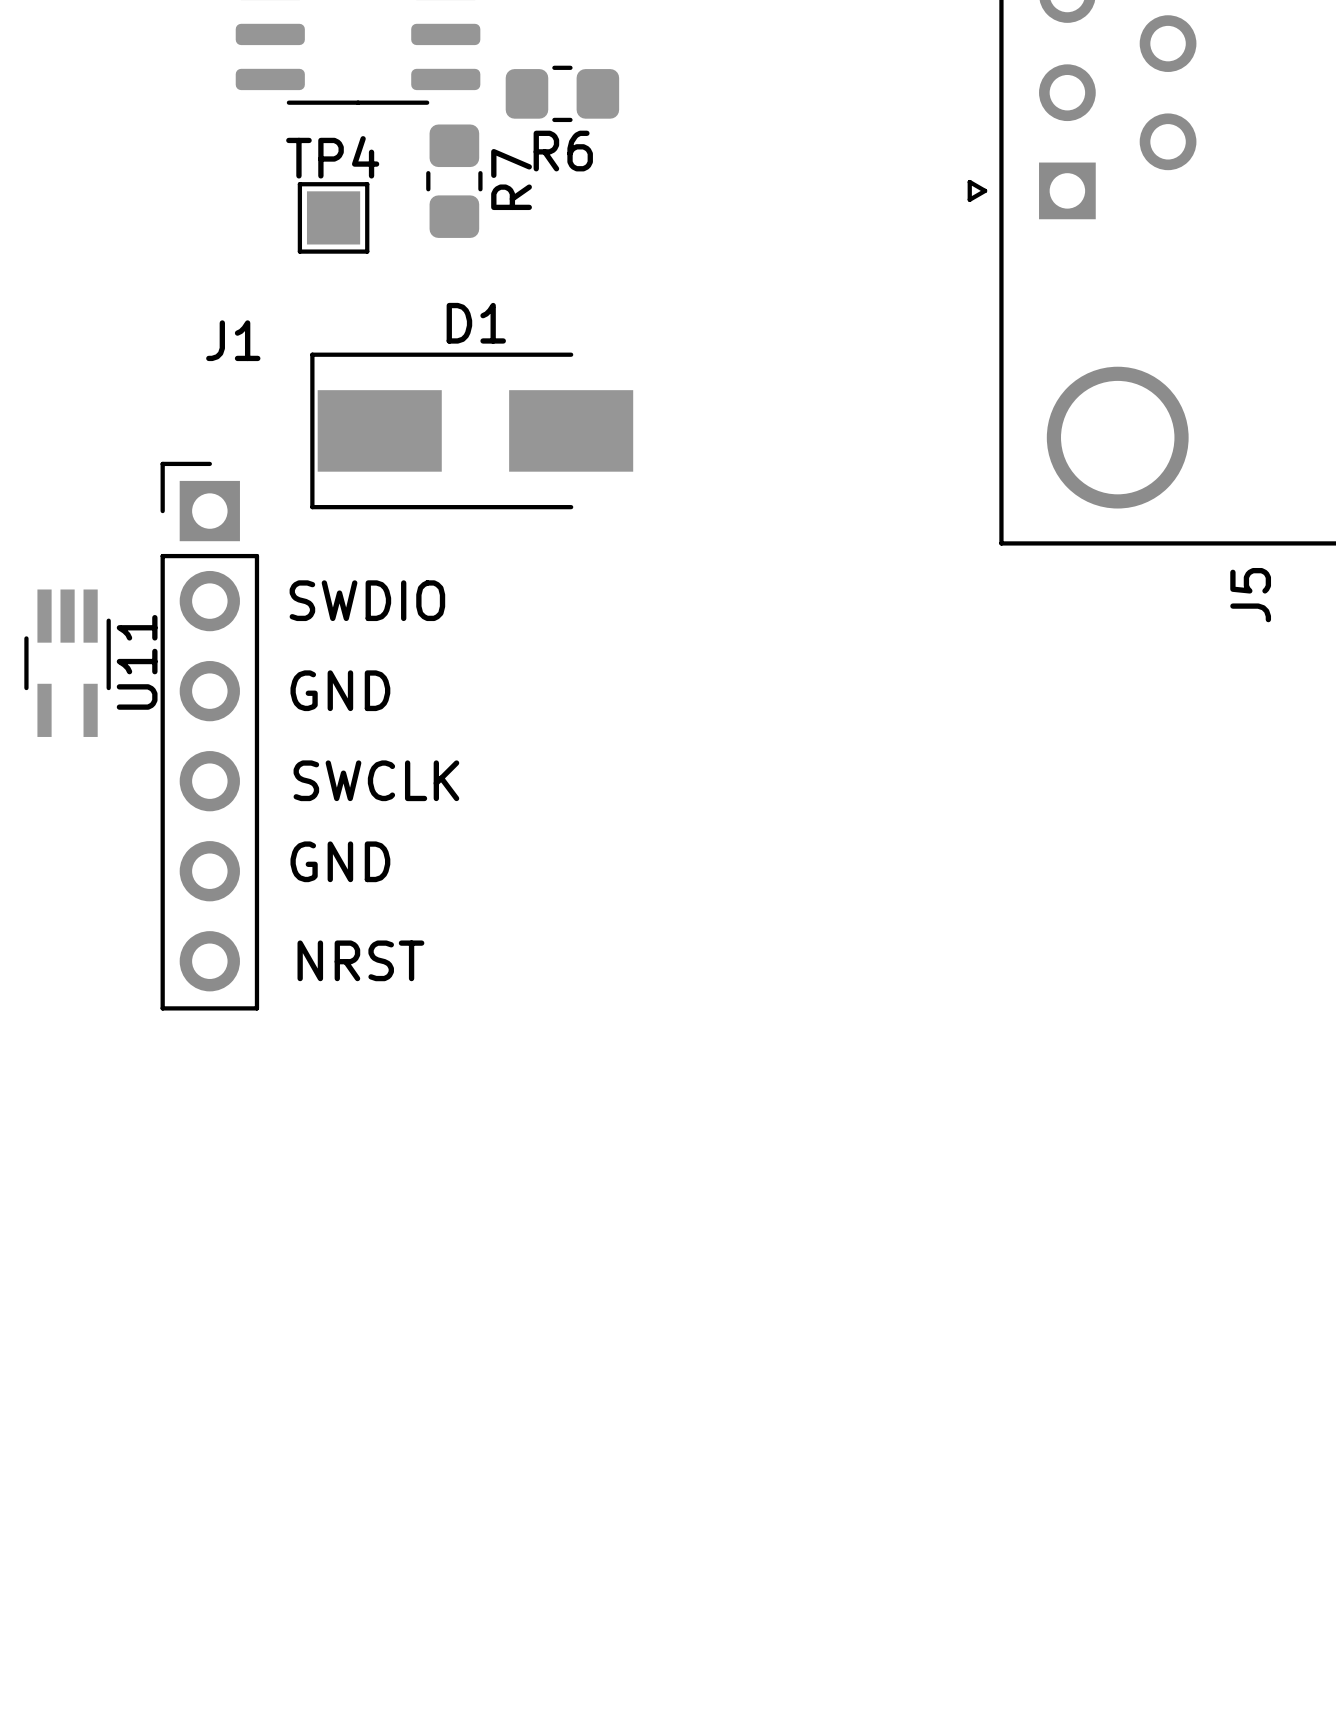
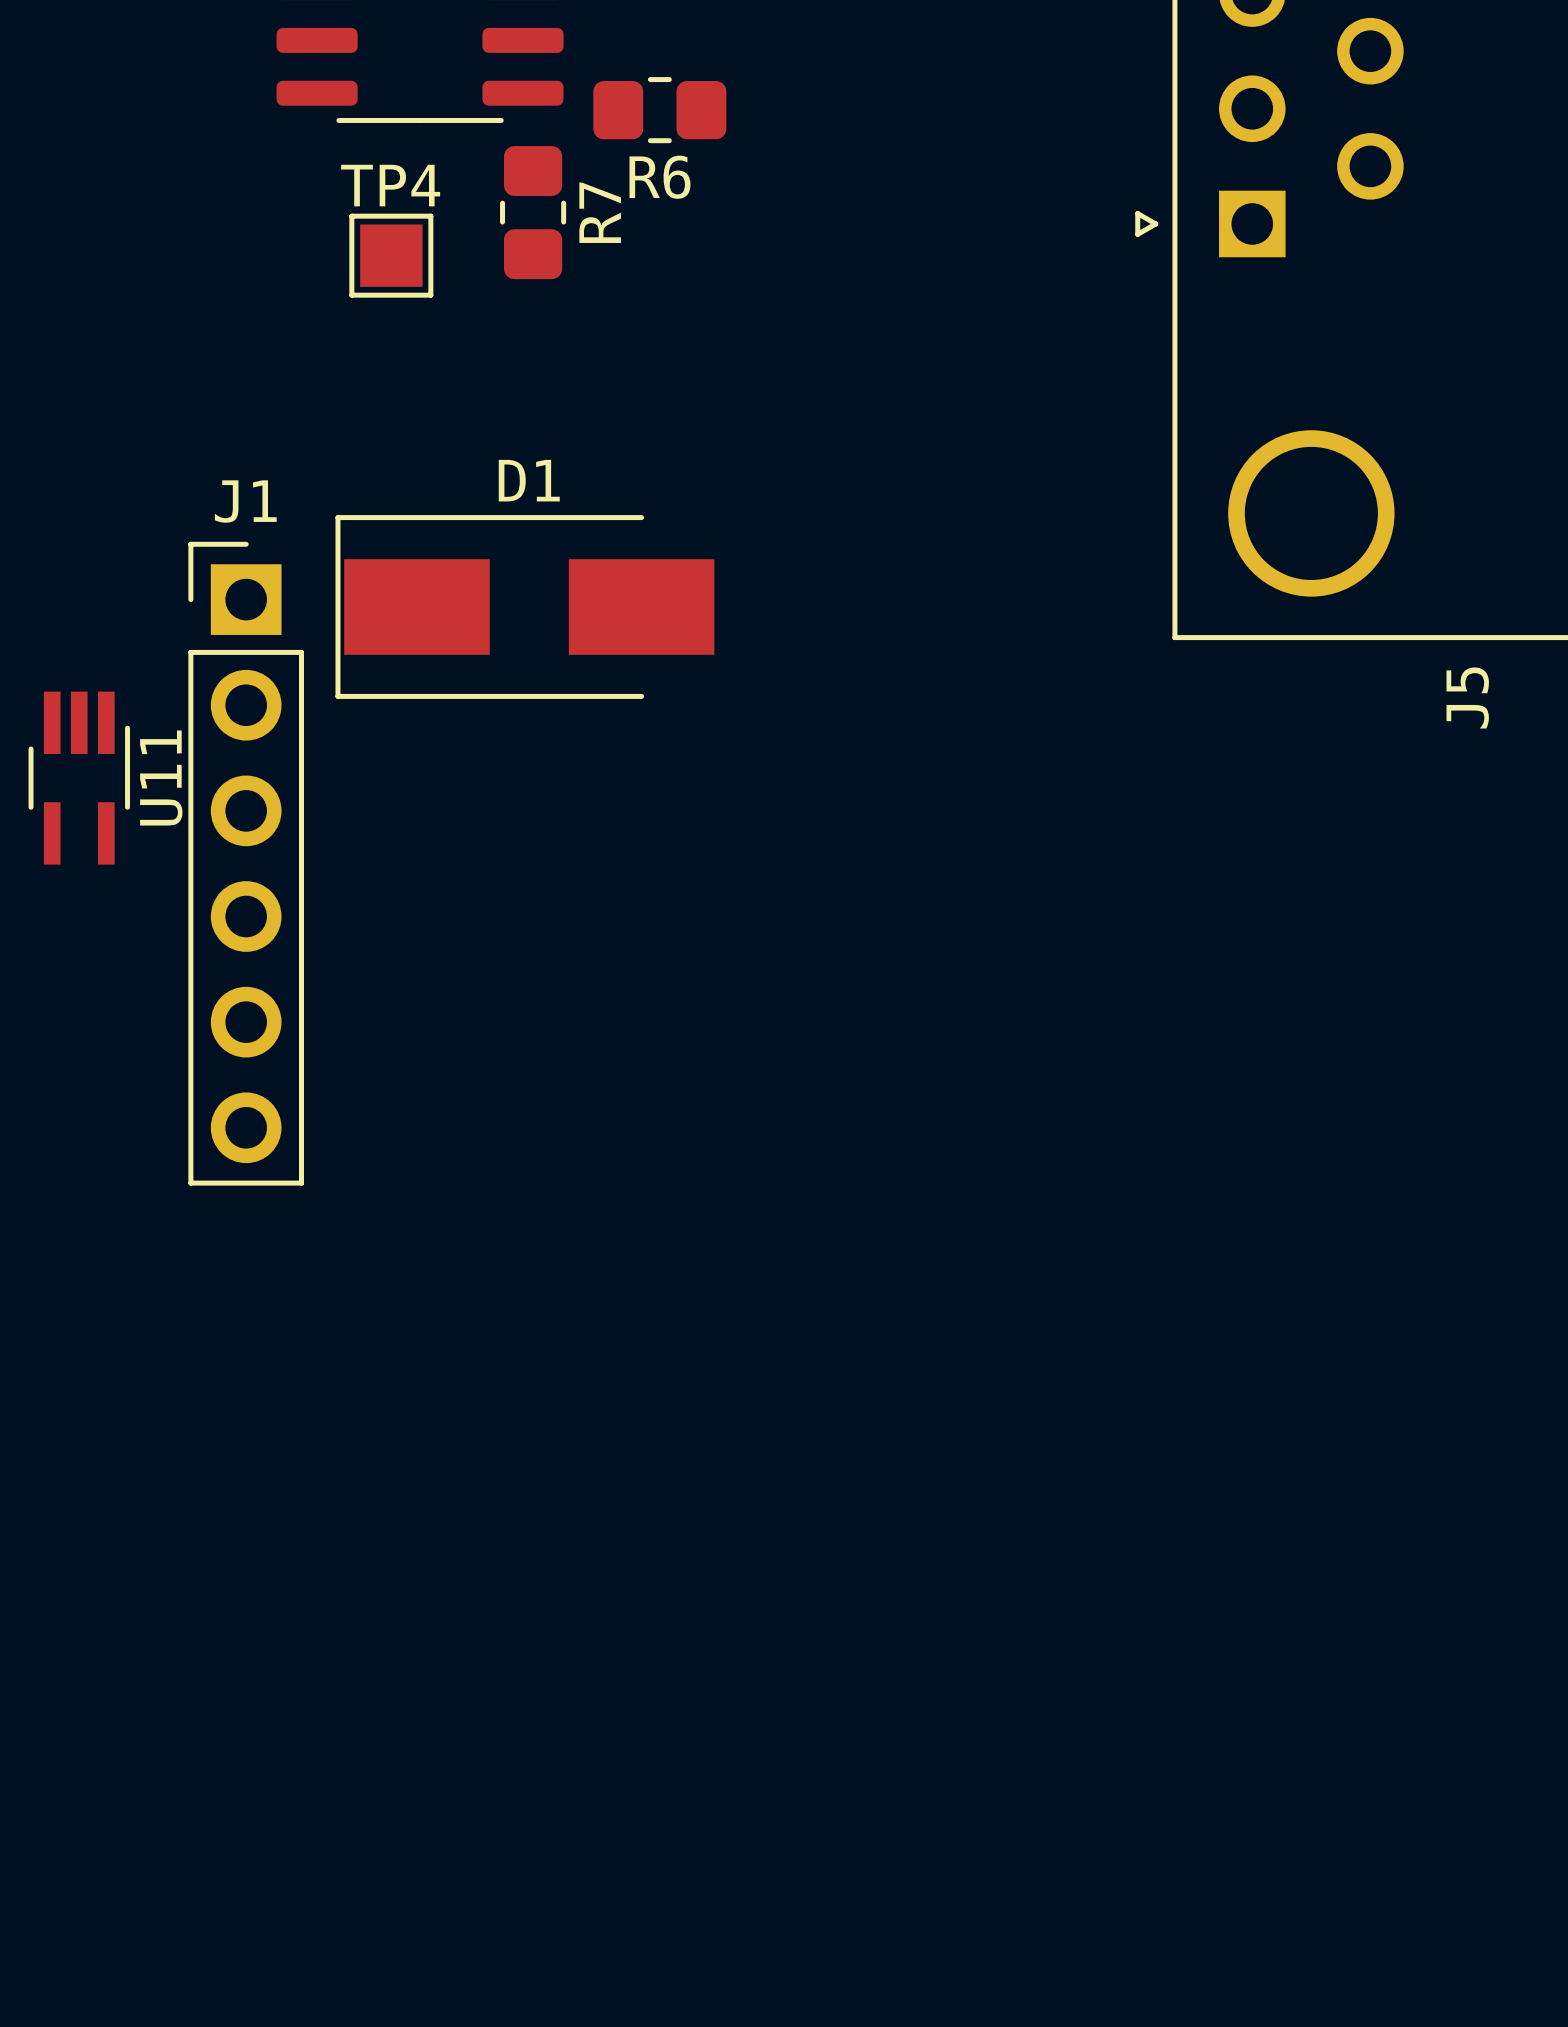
J1 name position: J1 (233, 340) -> J1 (245, 501)
D1 position: (471, 430) -> (524, 606)
text: SWDIO (367, 600) -> none
text: GND (340, 690) -> none
text: SWCLK (376, 780) -> none
text: GND (340, 861) -> none
text: NRST (360, 960) -> none

